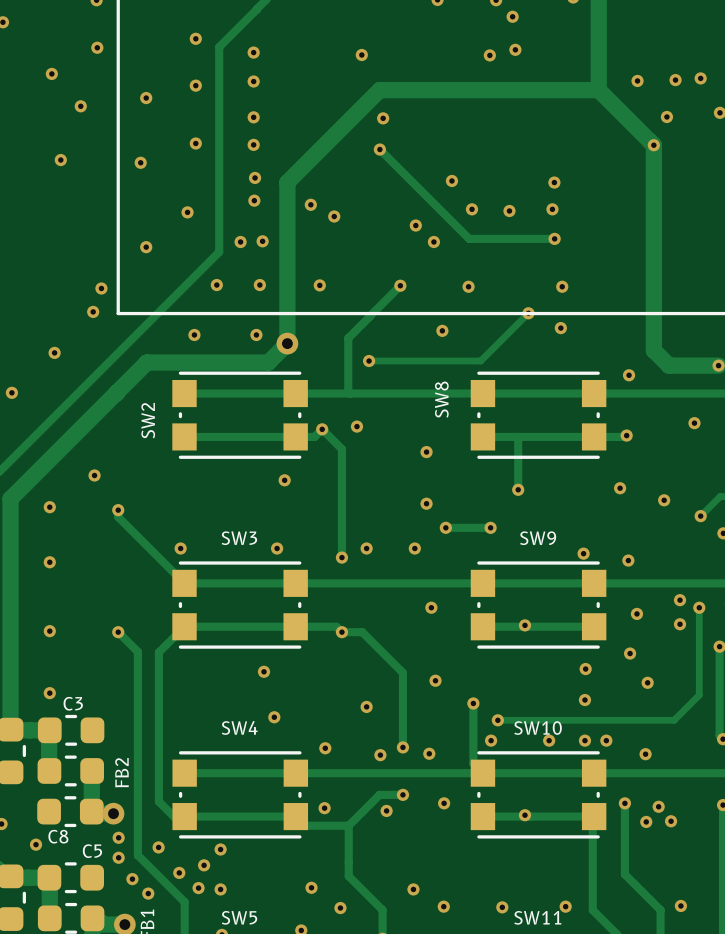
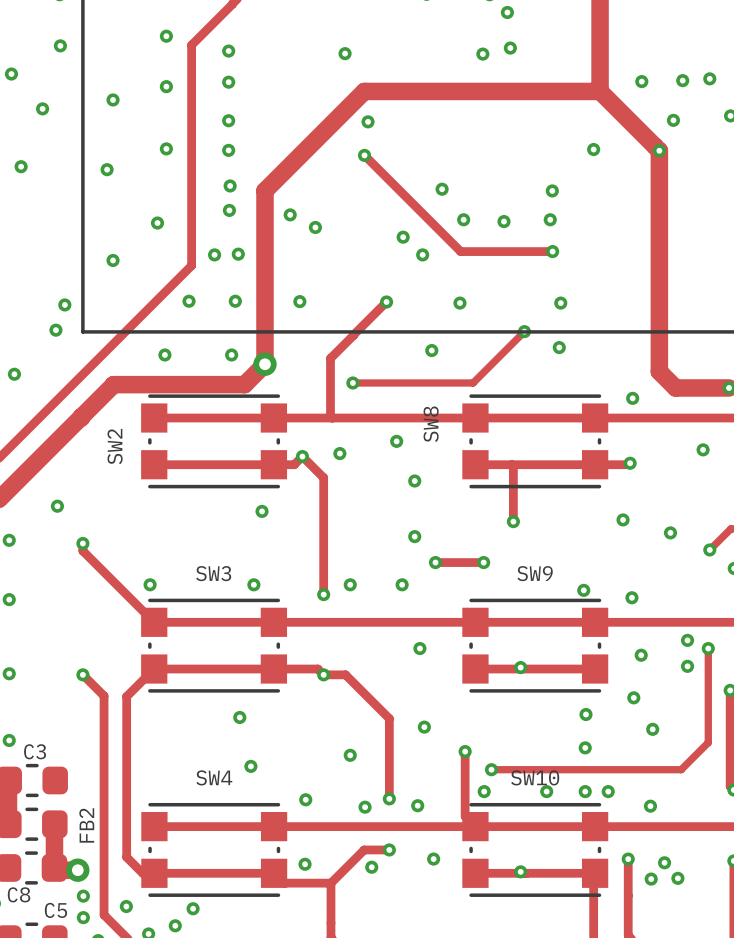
via: none -> (593, 149)
via: none -> (396, 441)

